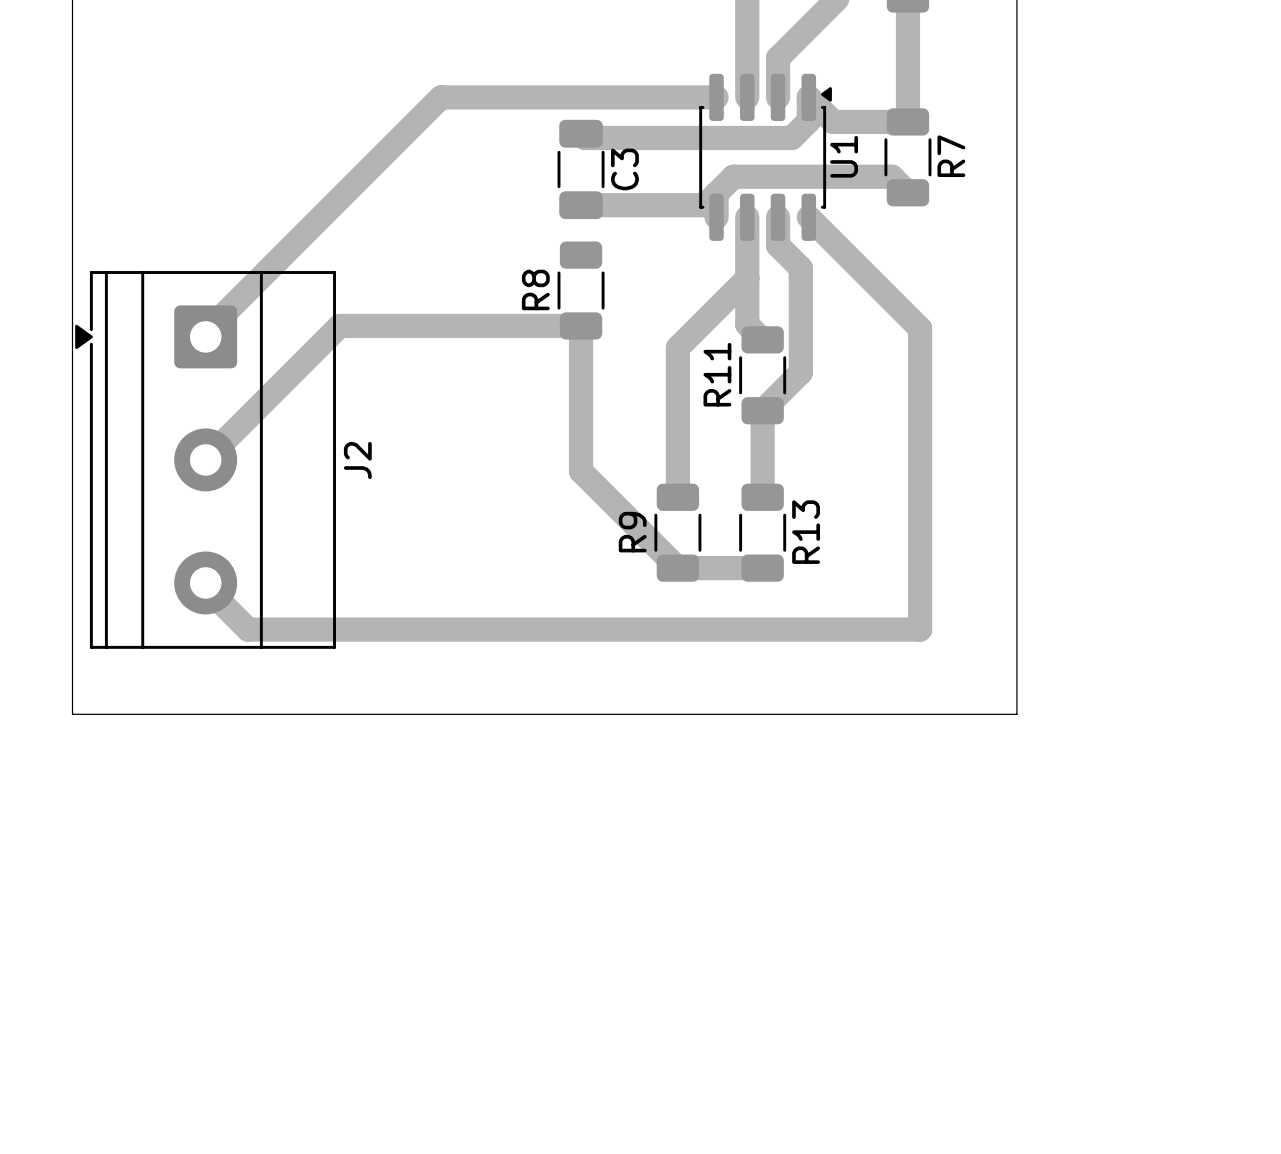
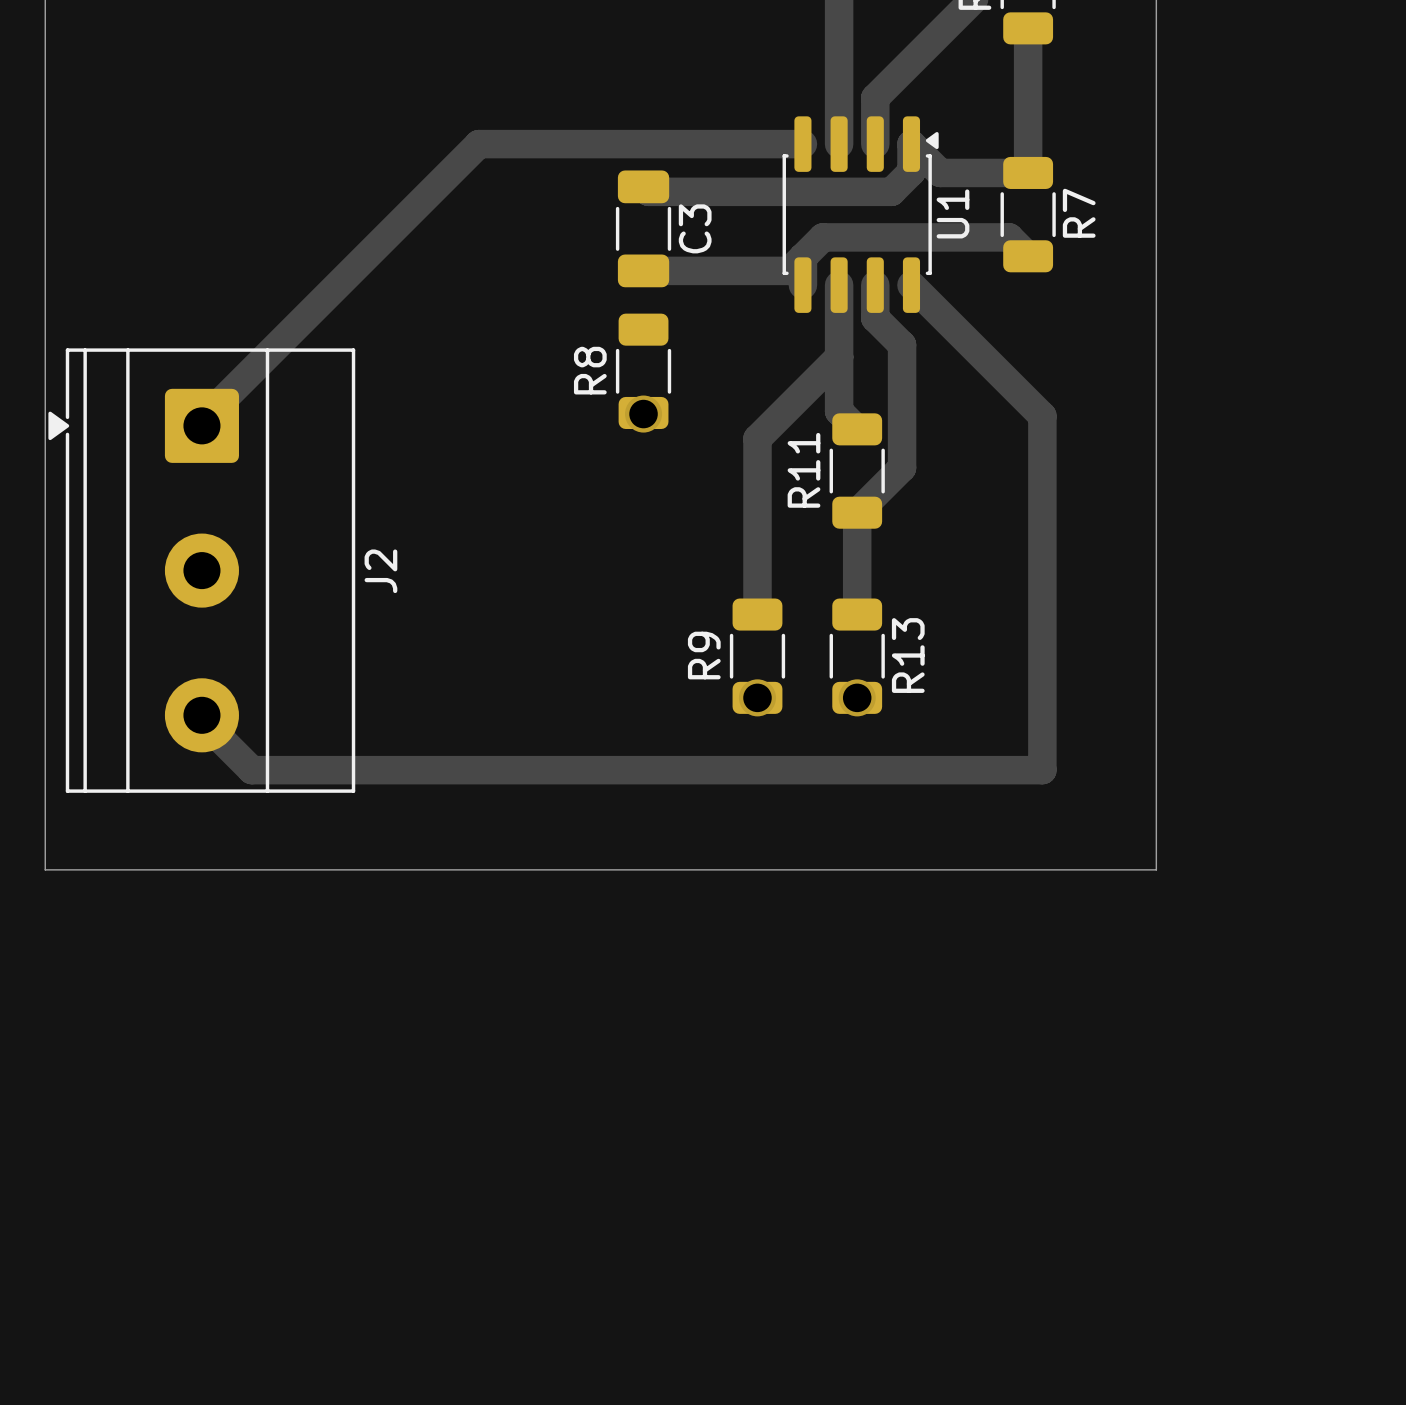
track: (581, 325) (339, 325) (205, 459) -> none
track: (581, 326) (581, 471) (677, 568) (762, 568) -> none
via: none -> (643, 414)
via: none -> (757, 697)
via: none -> (857, 697)

